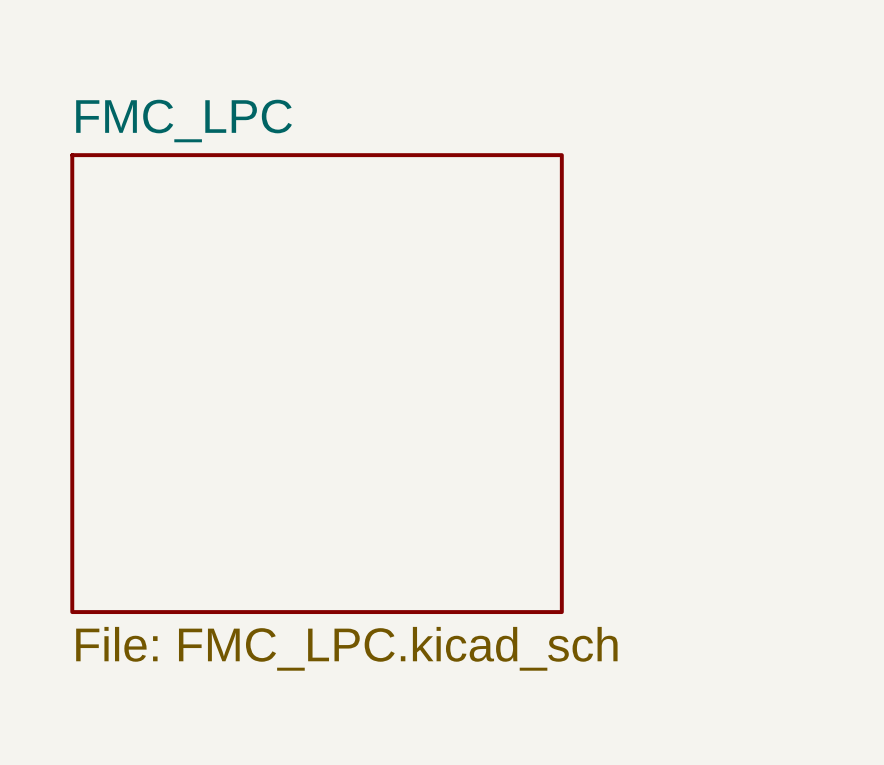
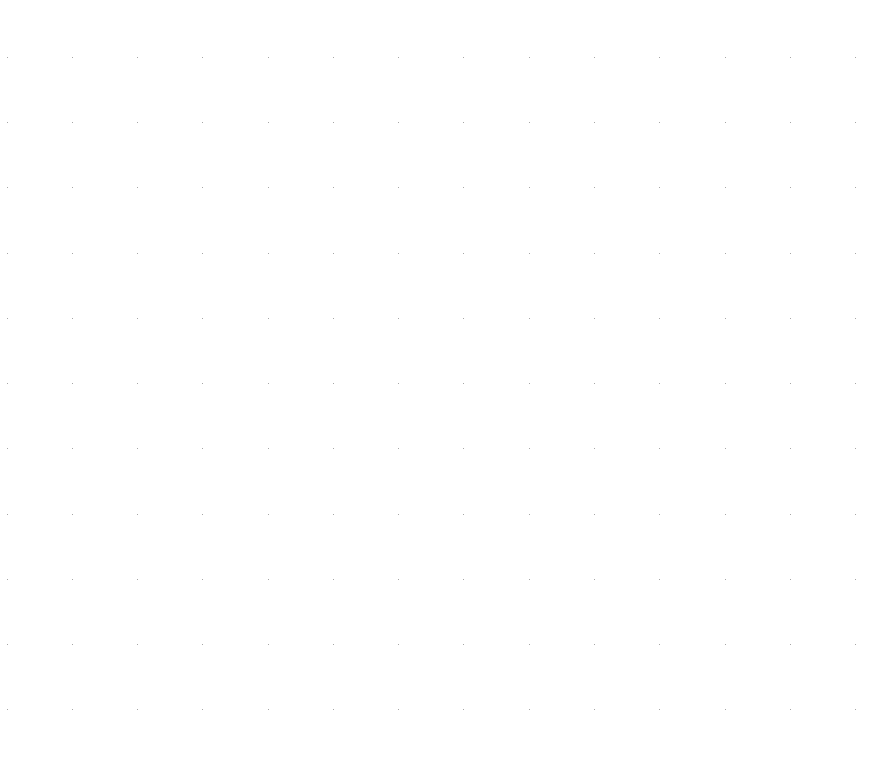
sheet FMC_LPC: File: FMC_LPC.kicad_sch (317, 383) -> none

